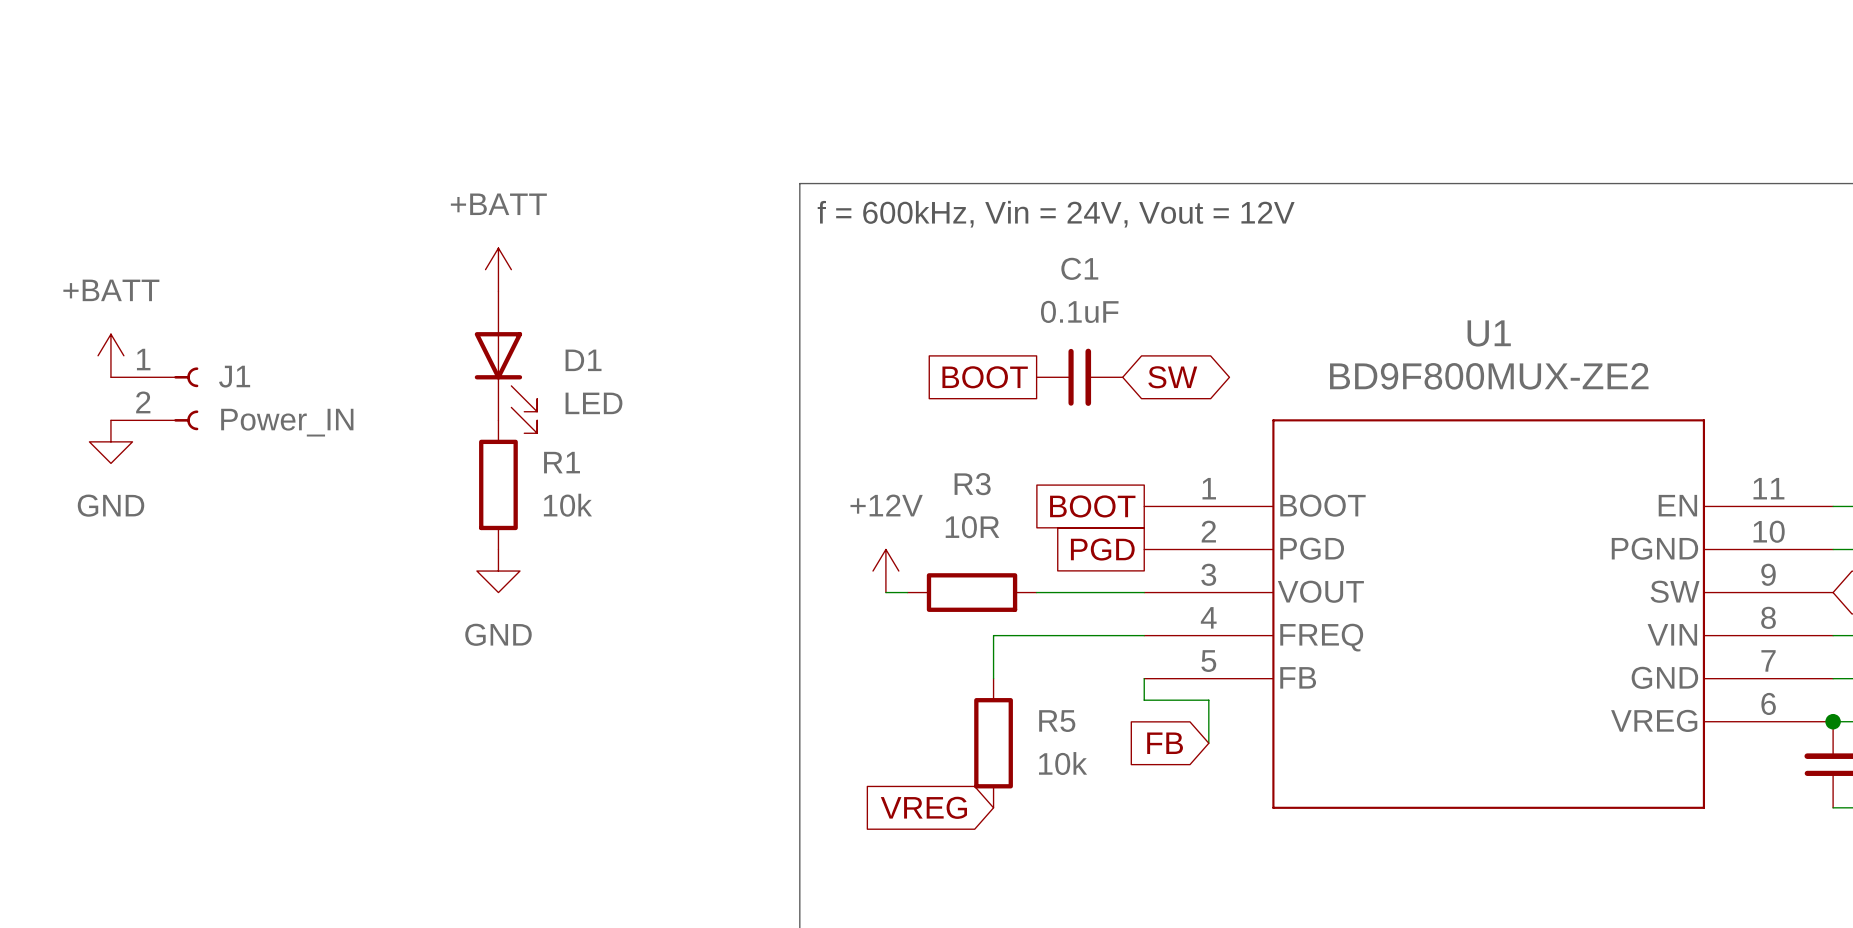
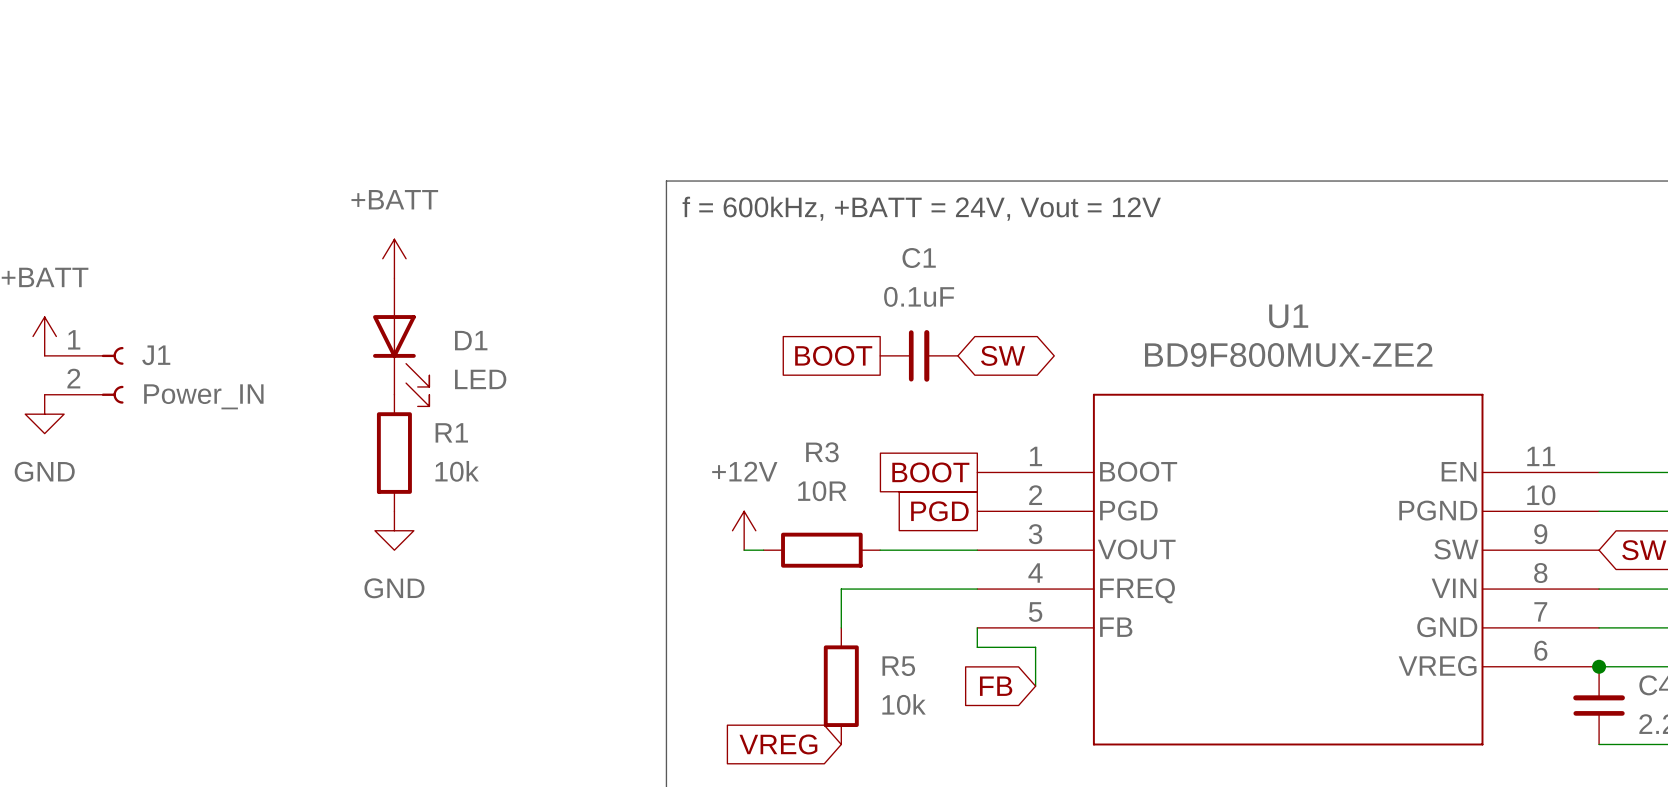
text: f = 600kHz, Vin = 24V, Vout = 12V (1056, 214) -> f = 600kHz, +BATT = 24V, Vout = 12V (921, 208)

